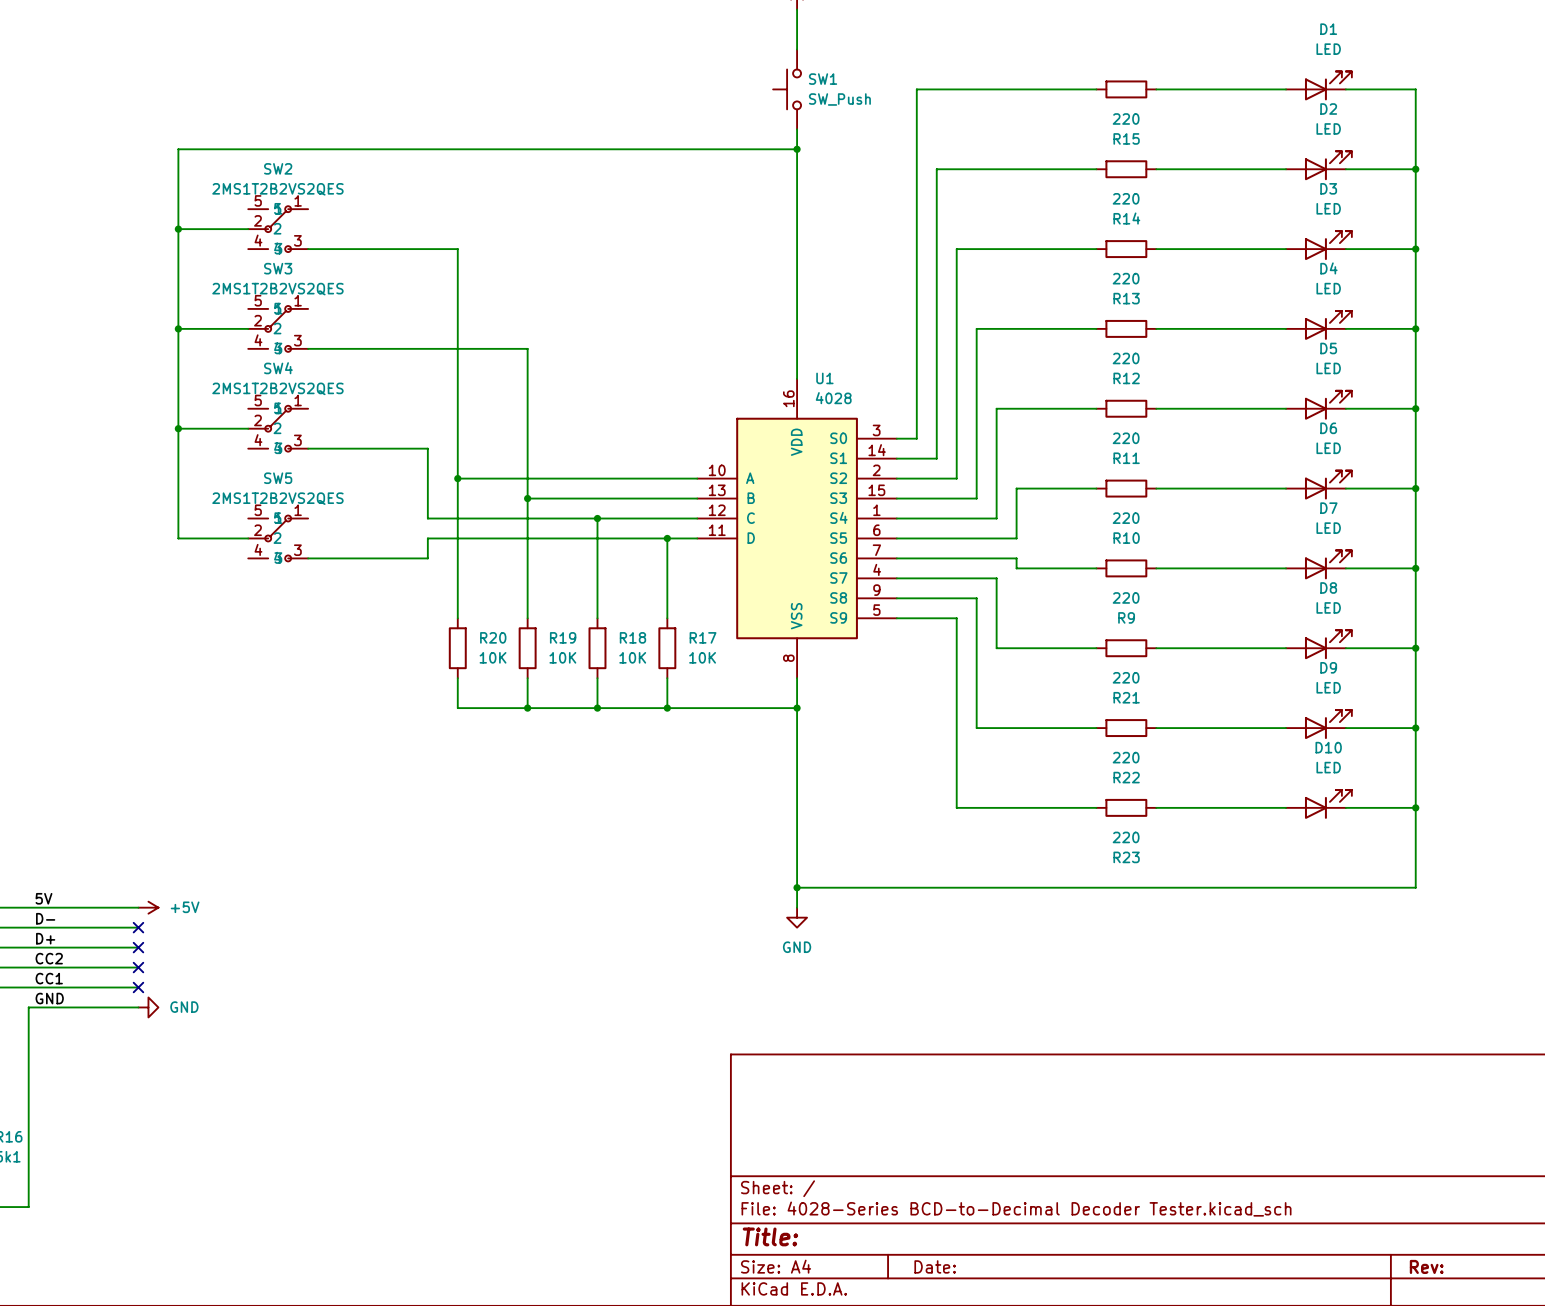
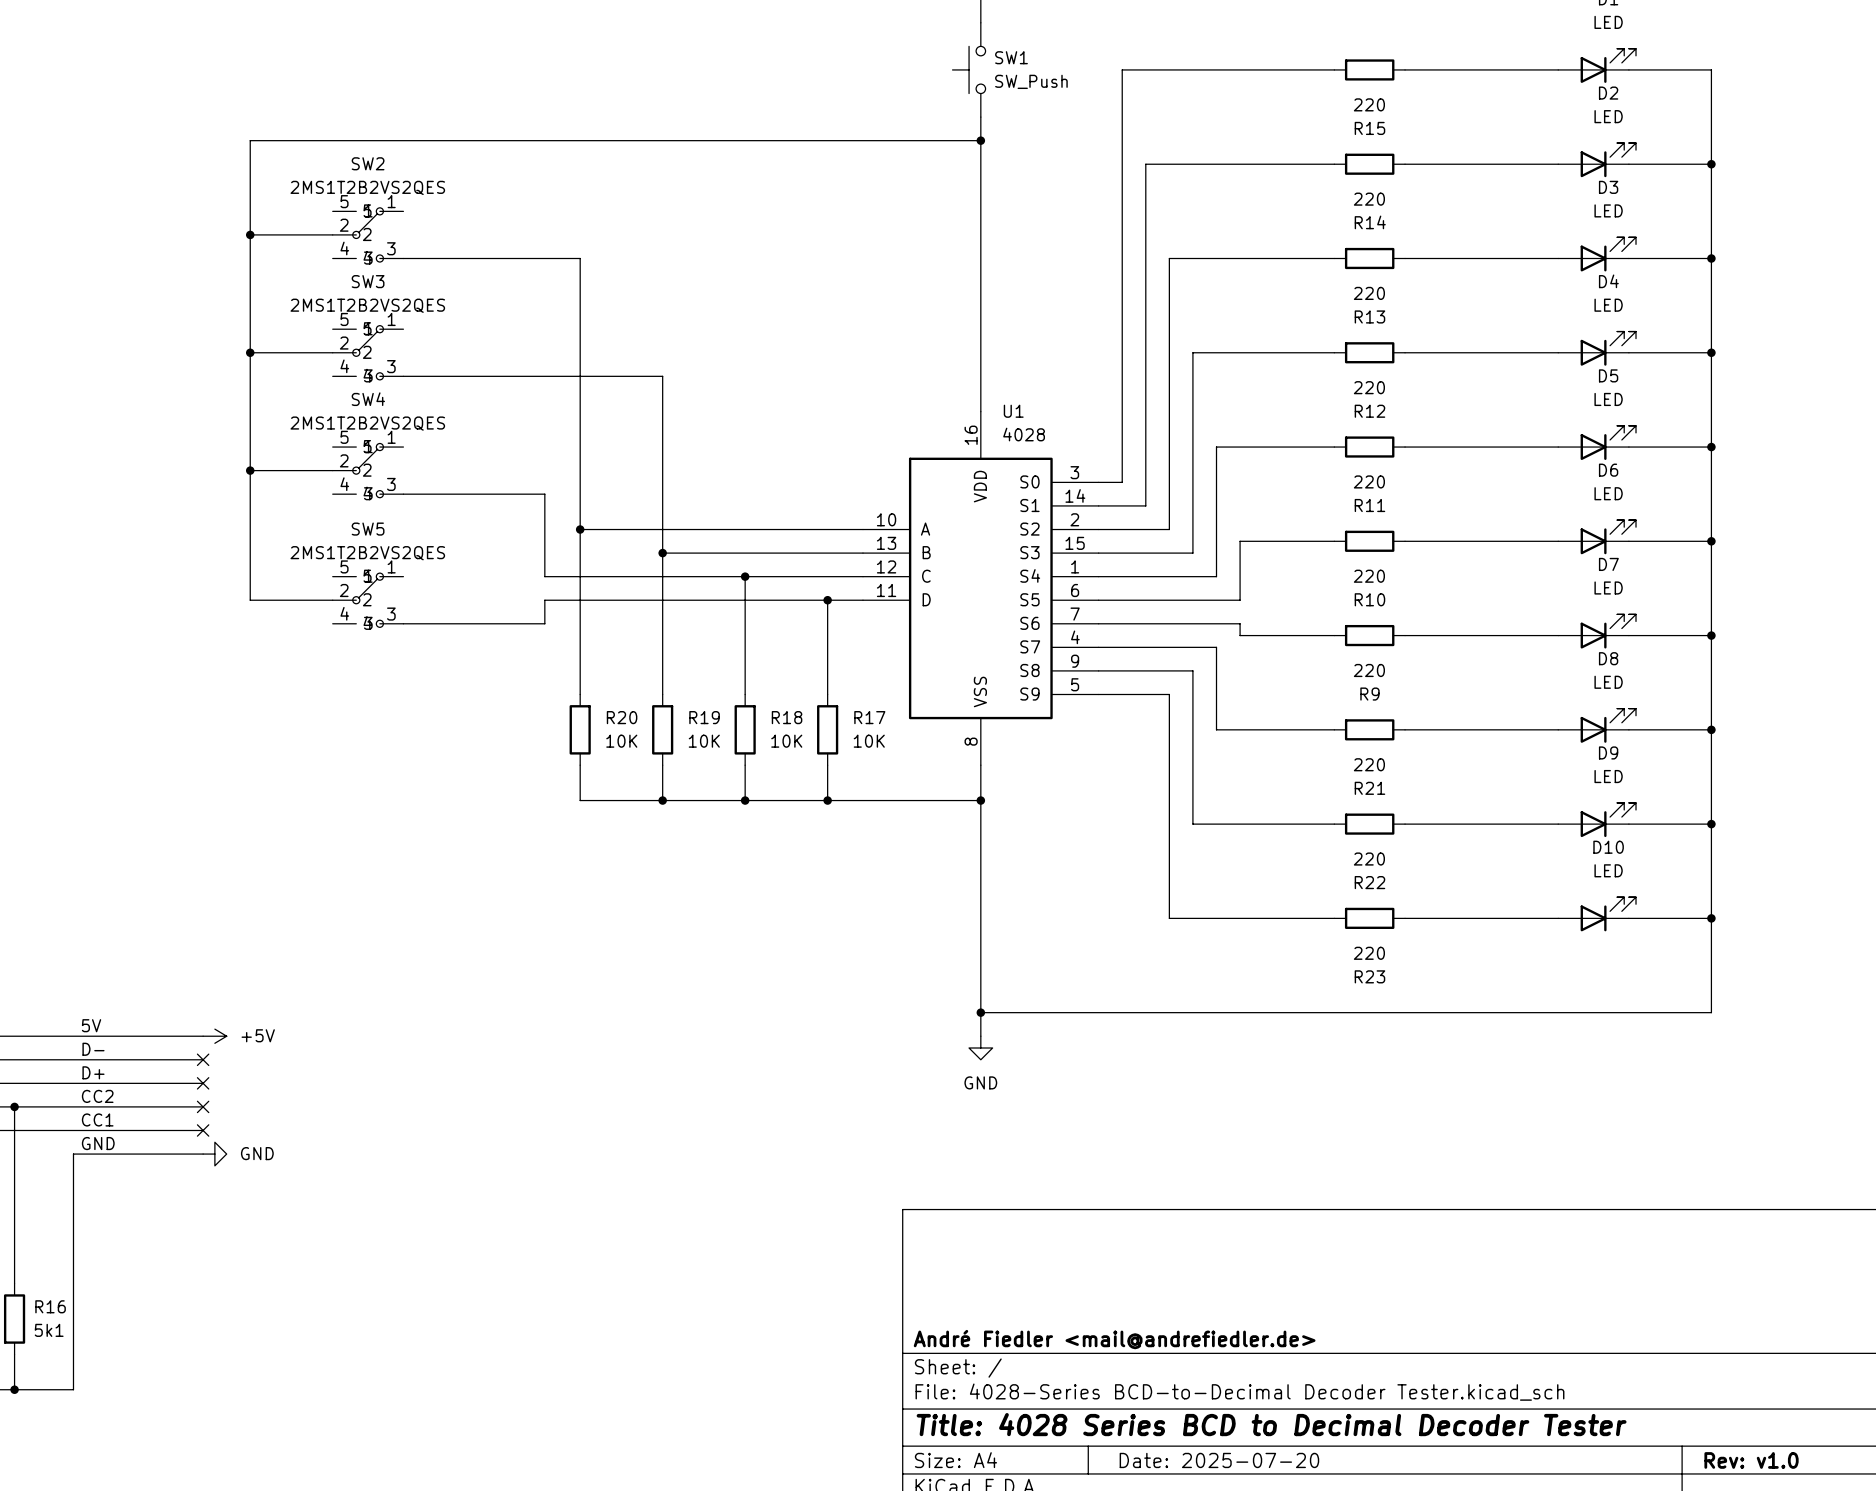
title block: none -> André Fiedler <mail@andrefiedler.de> (1114, 1339)
title block: Title: (770, 1236) -> Title: 4028 Series BCD to Decimal Decoder Tester (1271, 1424)
title block: Date: (935, 1266) -> Date: 2025-07-20 (1219, 1460)
title block: Rev: (1426, 1266) -> Rev: v1.0 (1751, 1460)

